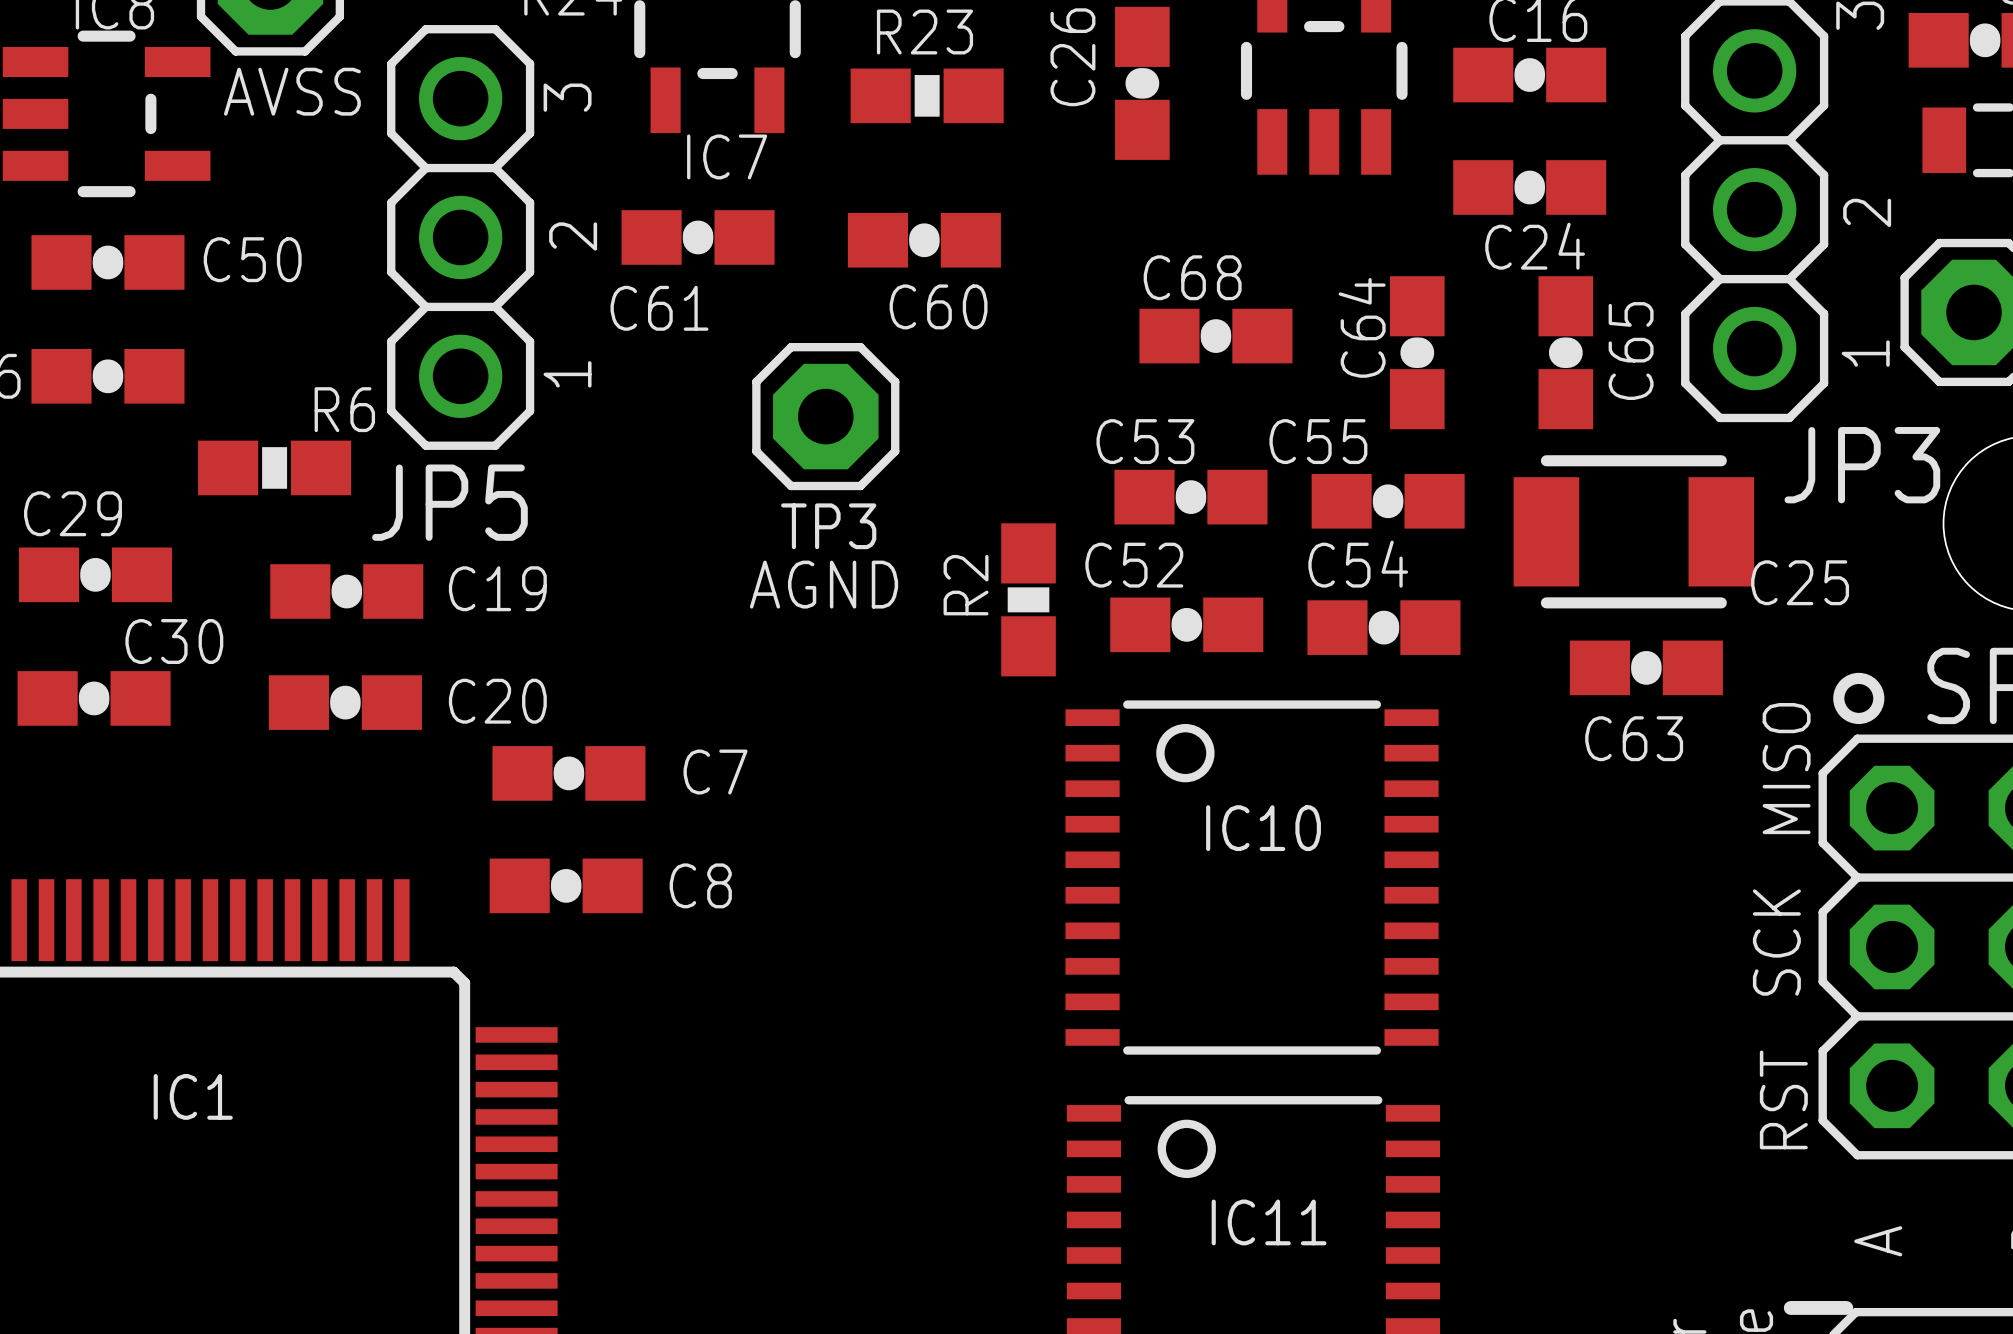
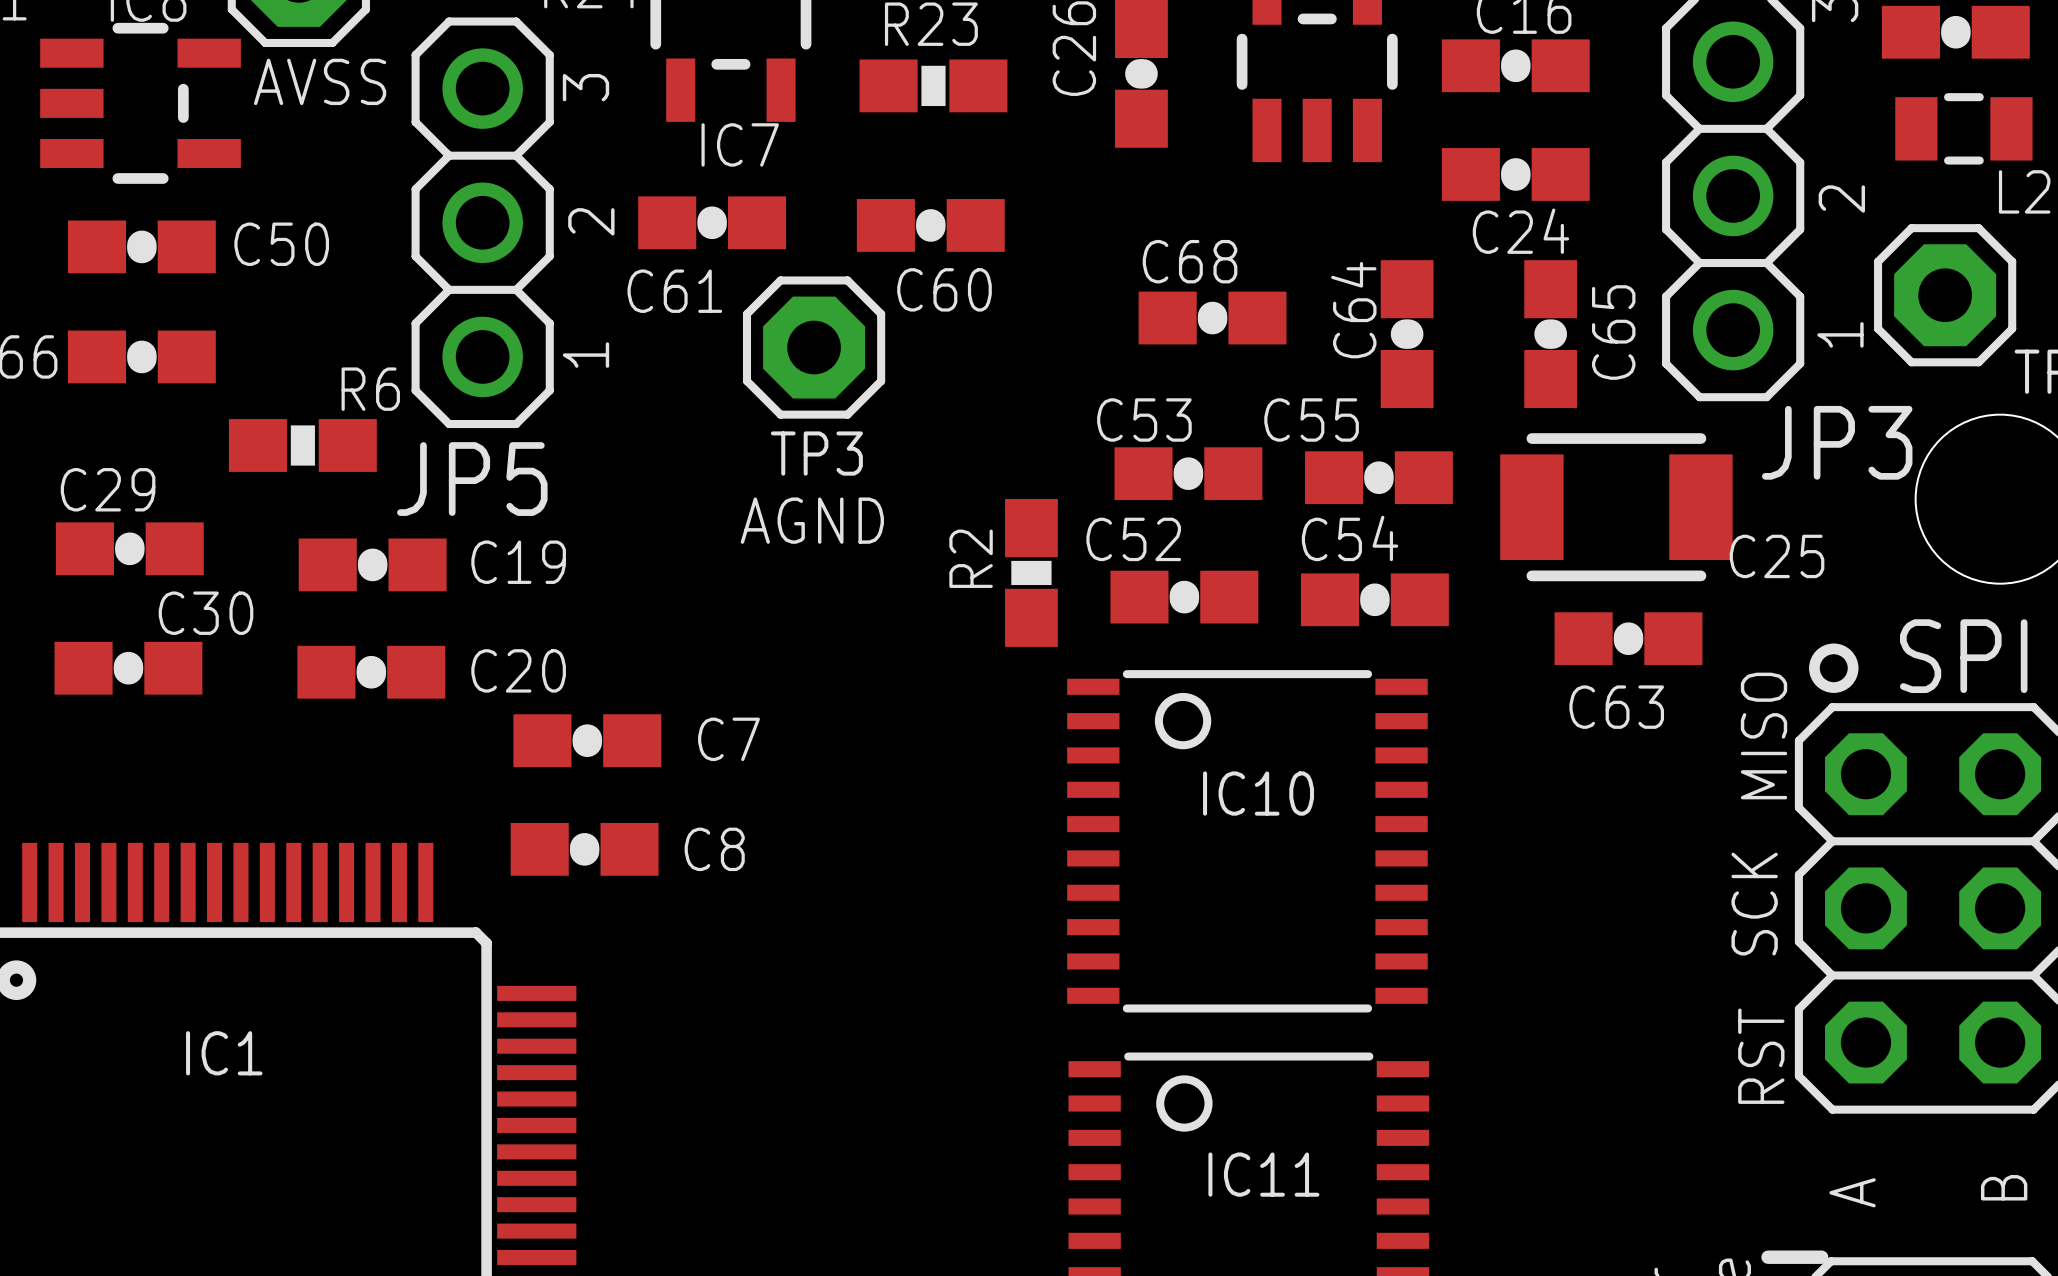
TP3 position: (825, 416) -> (814, 347)
text position: AGND (824, 584) -> AGND (812, 520)

